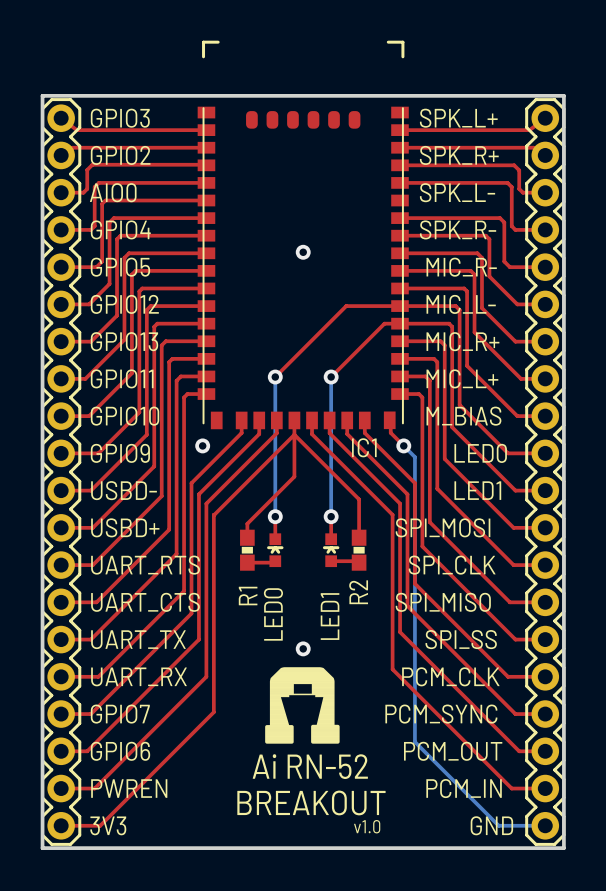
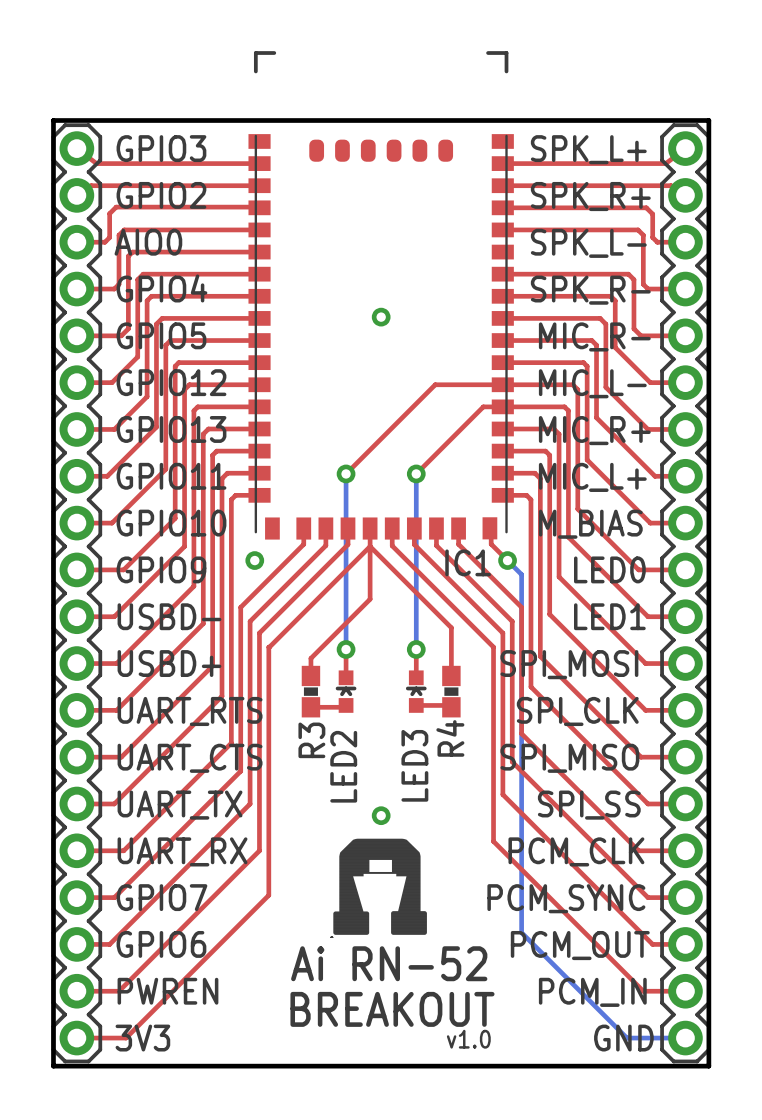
R2 name: R2 (358, 592) -> R4 (450, 738)
R1 name: R1 (248, 596) -> R3 (311, 740)
LED0 name: LED0 (273, 614) -> LED2 (343, 766)
LED1 name: LED1 (330, 616) -> LED3 (414, 765)

